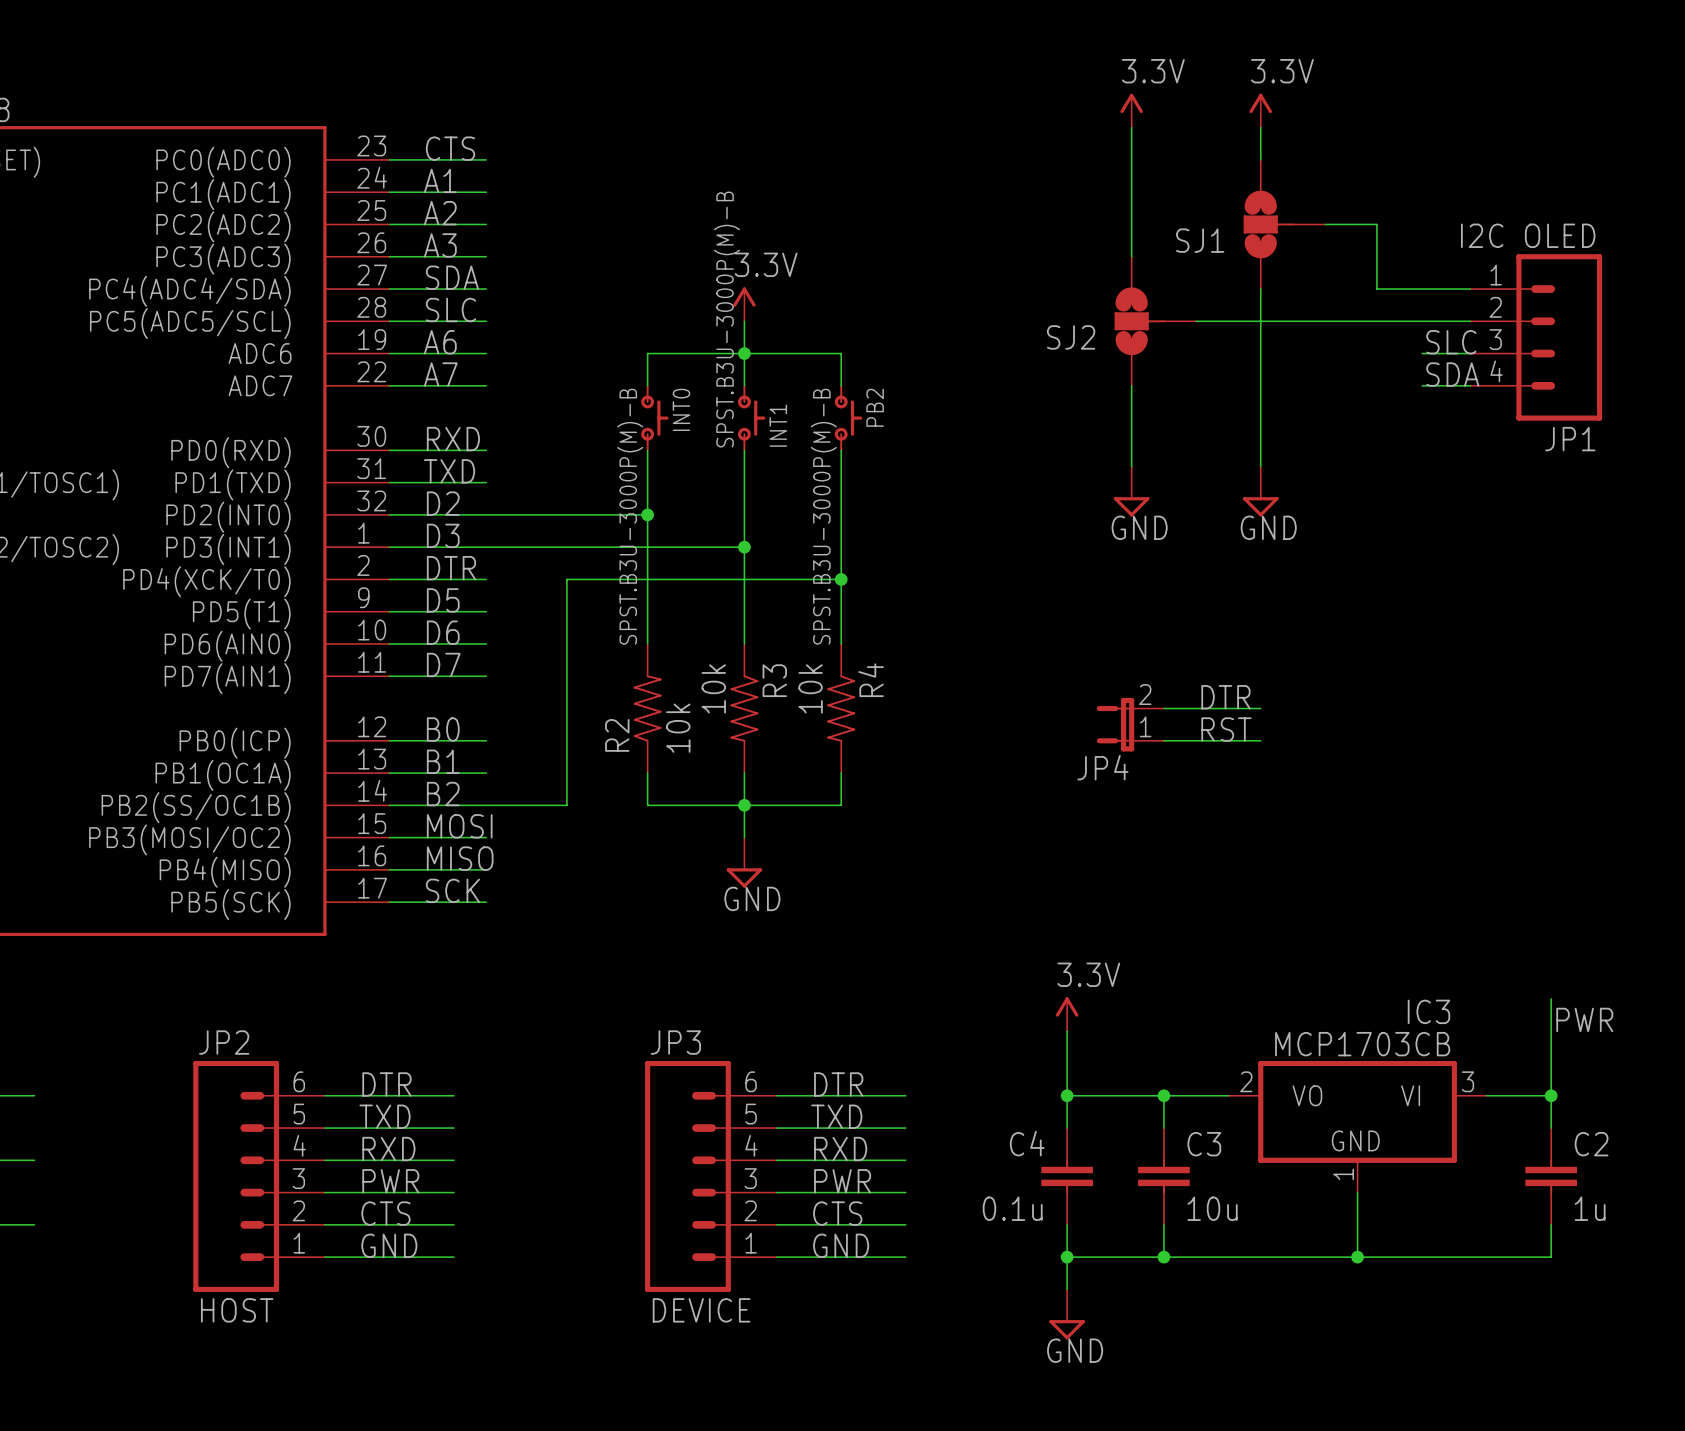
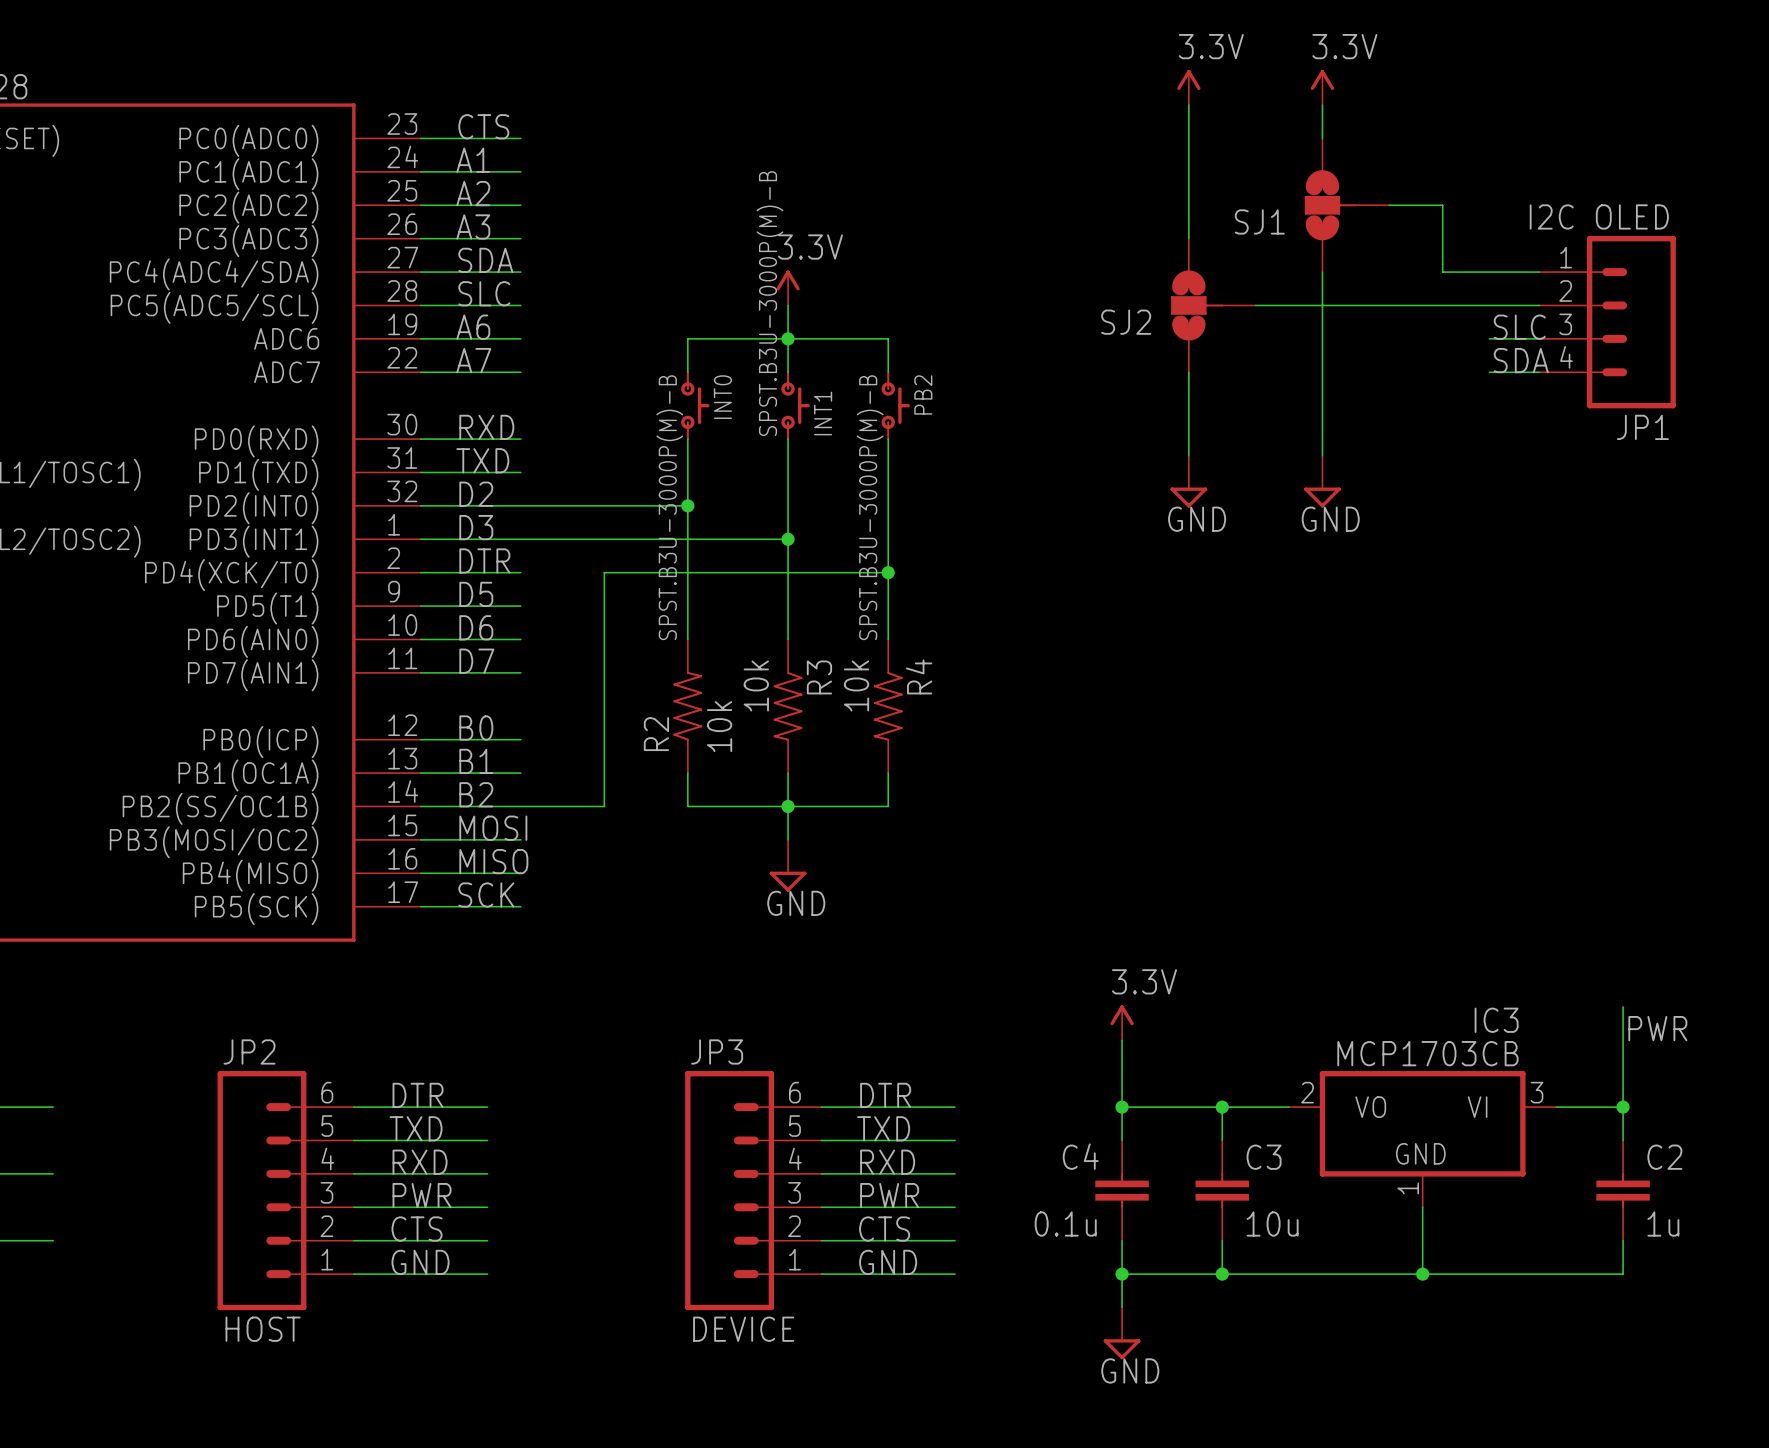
label: DTR (1225, 697) -> none
wire: (1163, 708) (1260, 708) -> none
JP4: (1130, 724) -> none
label: RST (1226, 729) -> none
wire: (1163, 740) (1260, 740) -> none

